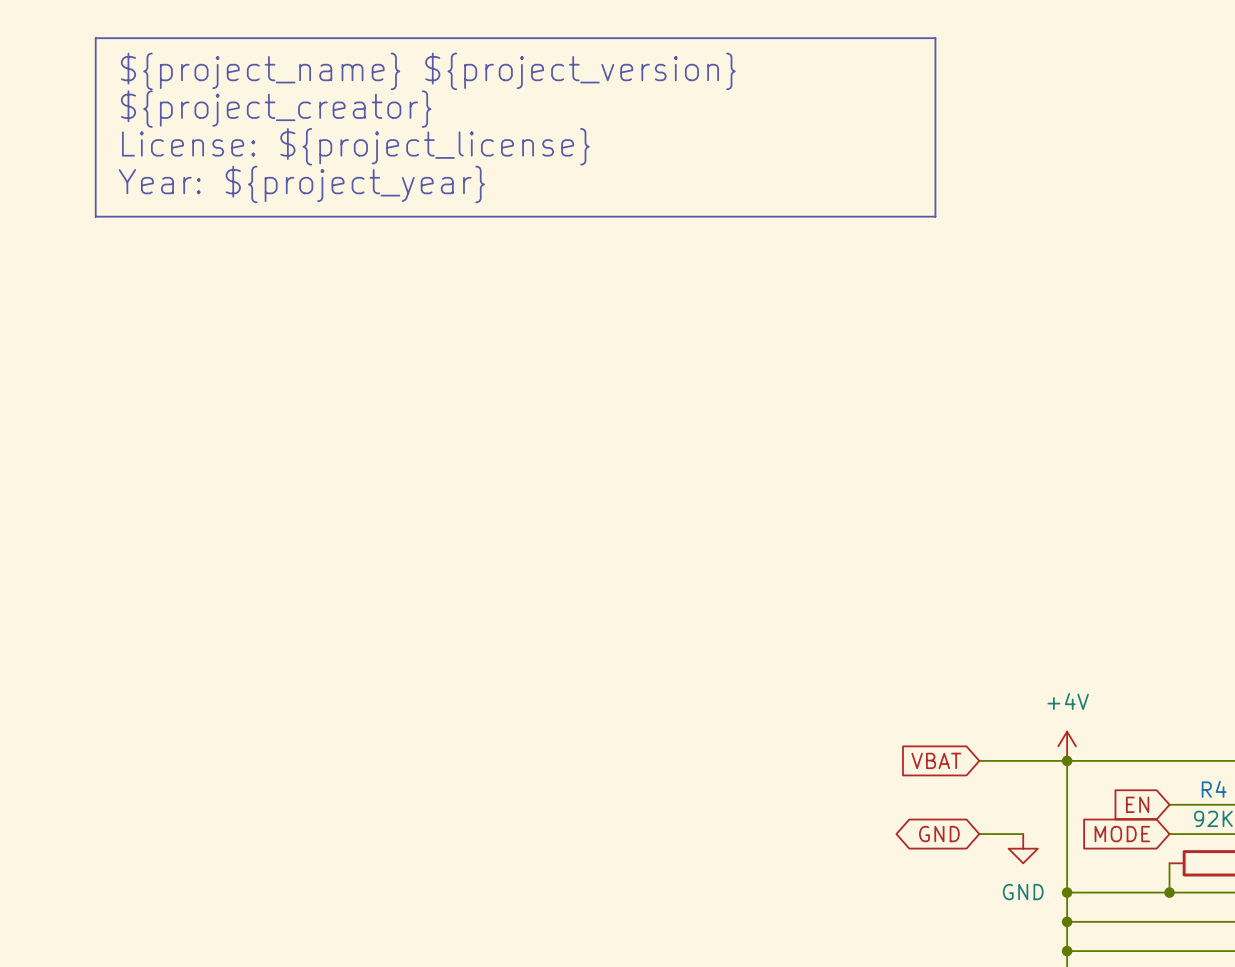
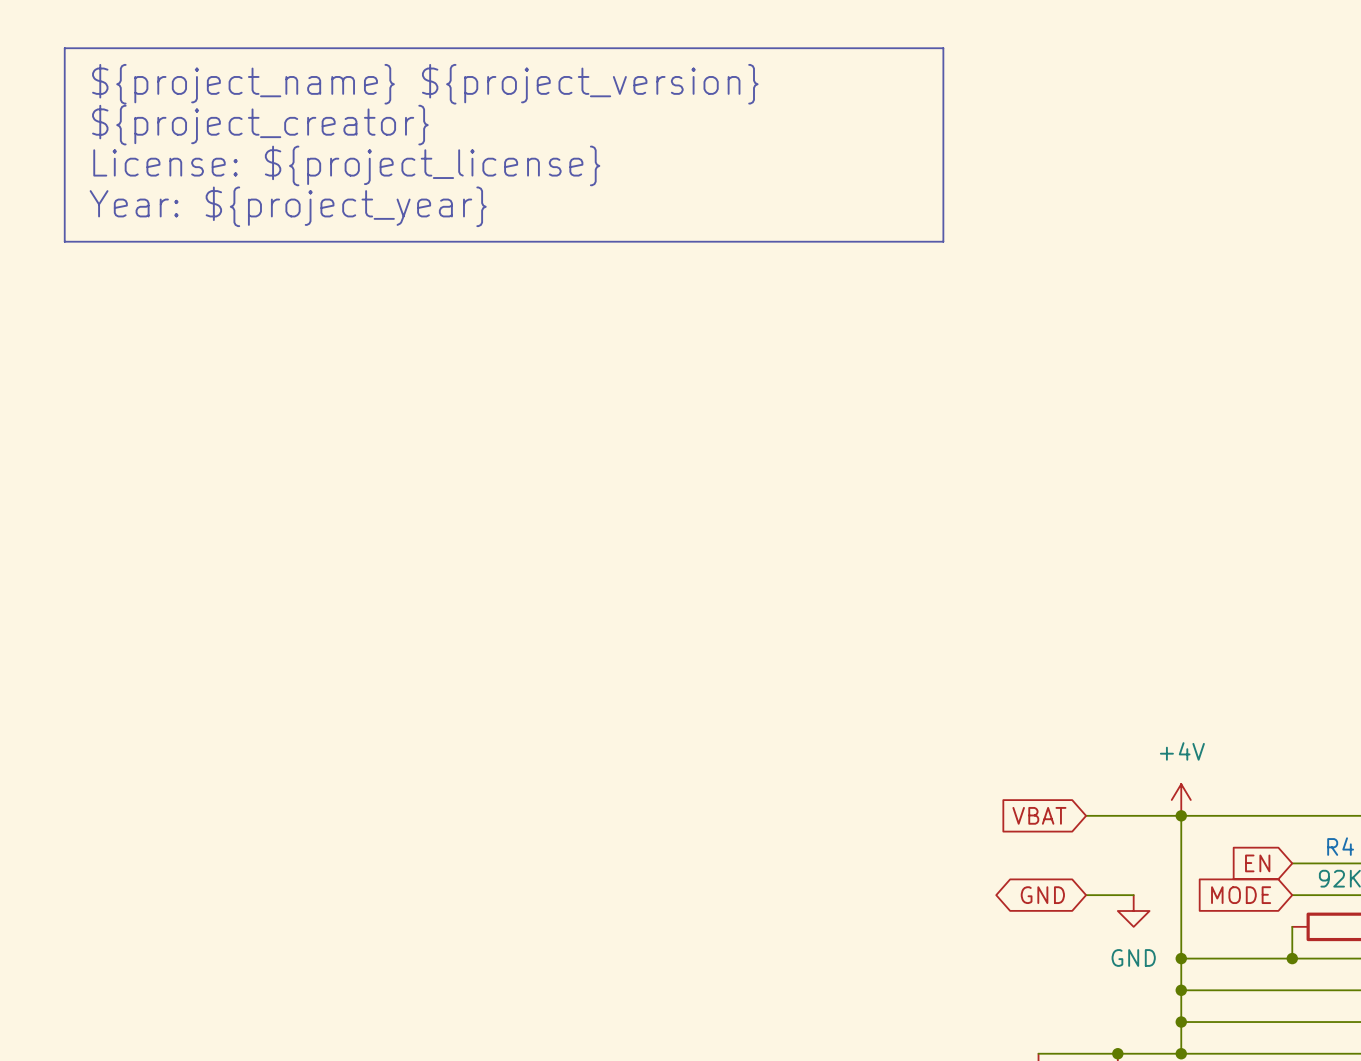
line: (95, 38) (935, 38) (935, 216) (95, 216) (95, 38) -> (64, 48) (64, 241) (943, 241) (943, 48) (64, 48)
text position: ${project_name} ${project_version} (428, 71) -> ${project_name} ${project_version} (425, 84)
text position: ${project_creator} (276, 109) -> ${project_creator} (260, 125)
text position: License: ${project_license} (355, 146) -> License: ${project_license} (346, 165)
text position: Year: ${project_year} (301, 184) -> Year: ${project_year} (288, 206)

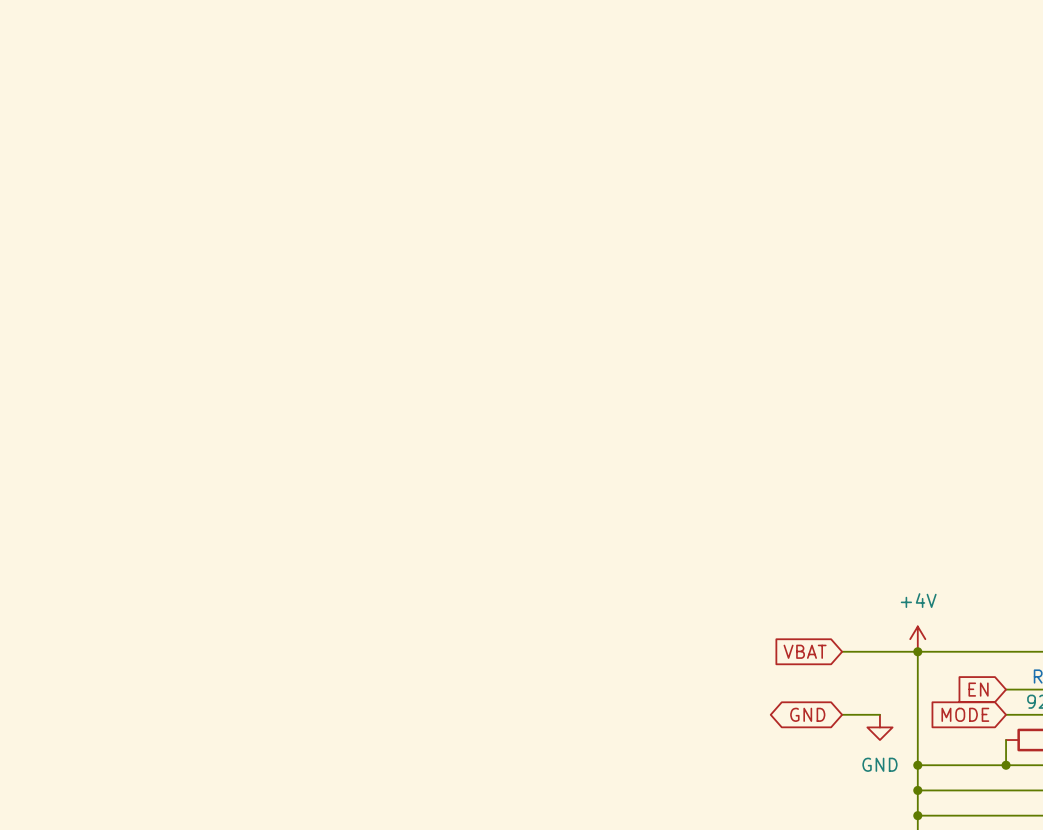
line: (64, 48) (943, 48) (943, 241) (64, 241) (64, 48) -> none
text: ${project_name} ${project_version} (425, 84) -> none
text: ${project_creator} (260, 125) -> none
text: License: ${project_license} (346, 165) -> none
text: Year: ${project_year} (288, 206) -> none

